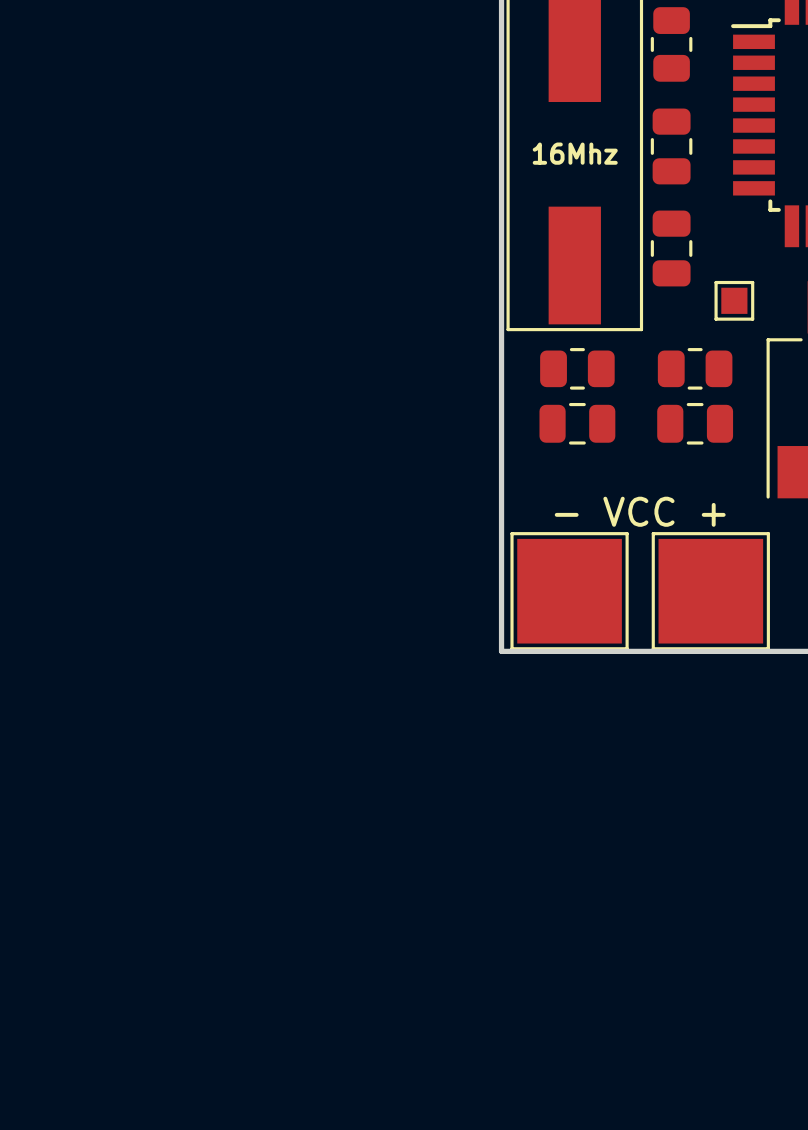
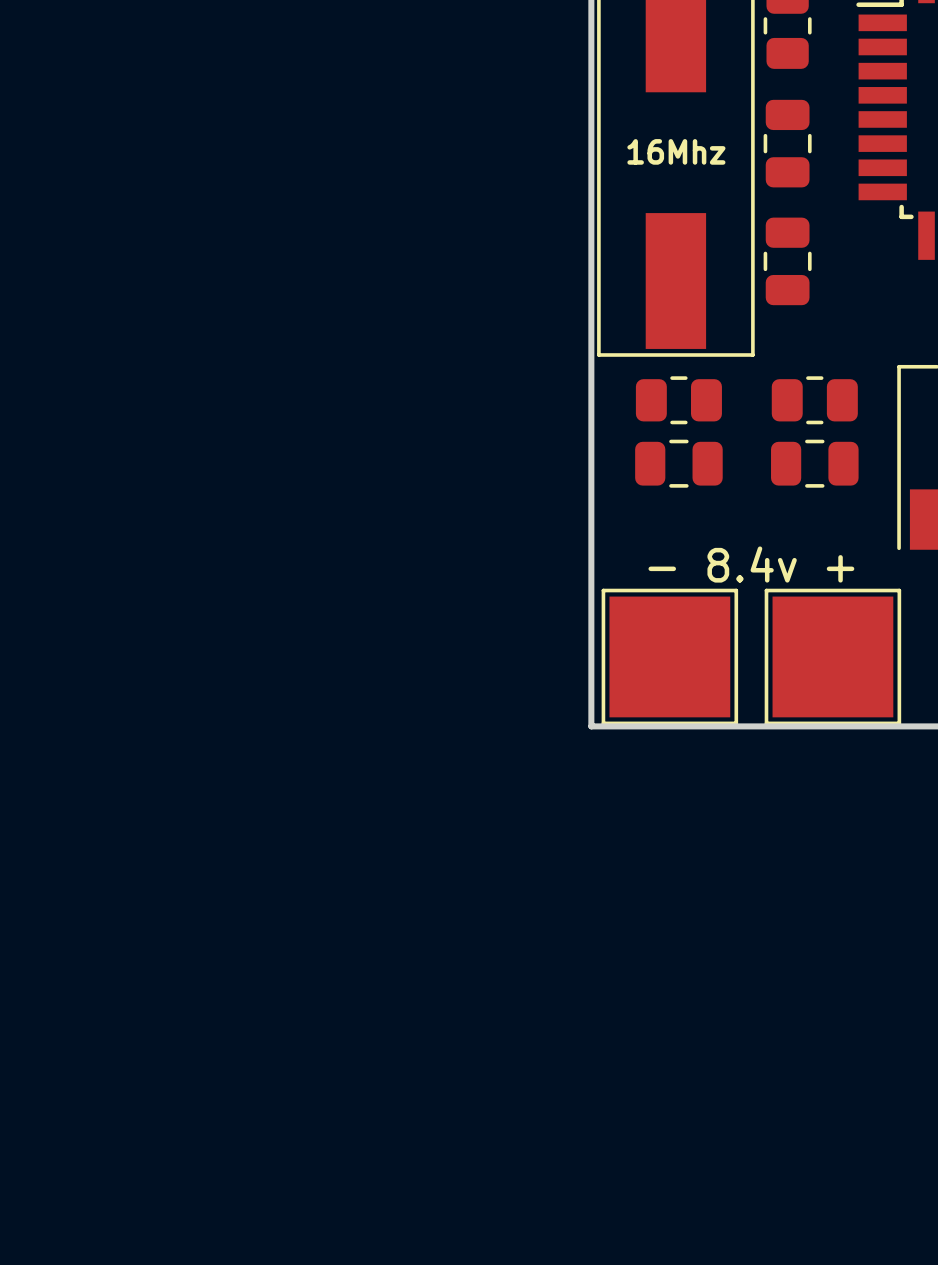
part: (734, 300) -> none
text: - VCC + (640, 511) -> - 8.4v + (751, 564)

